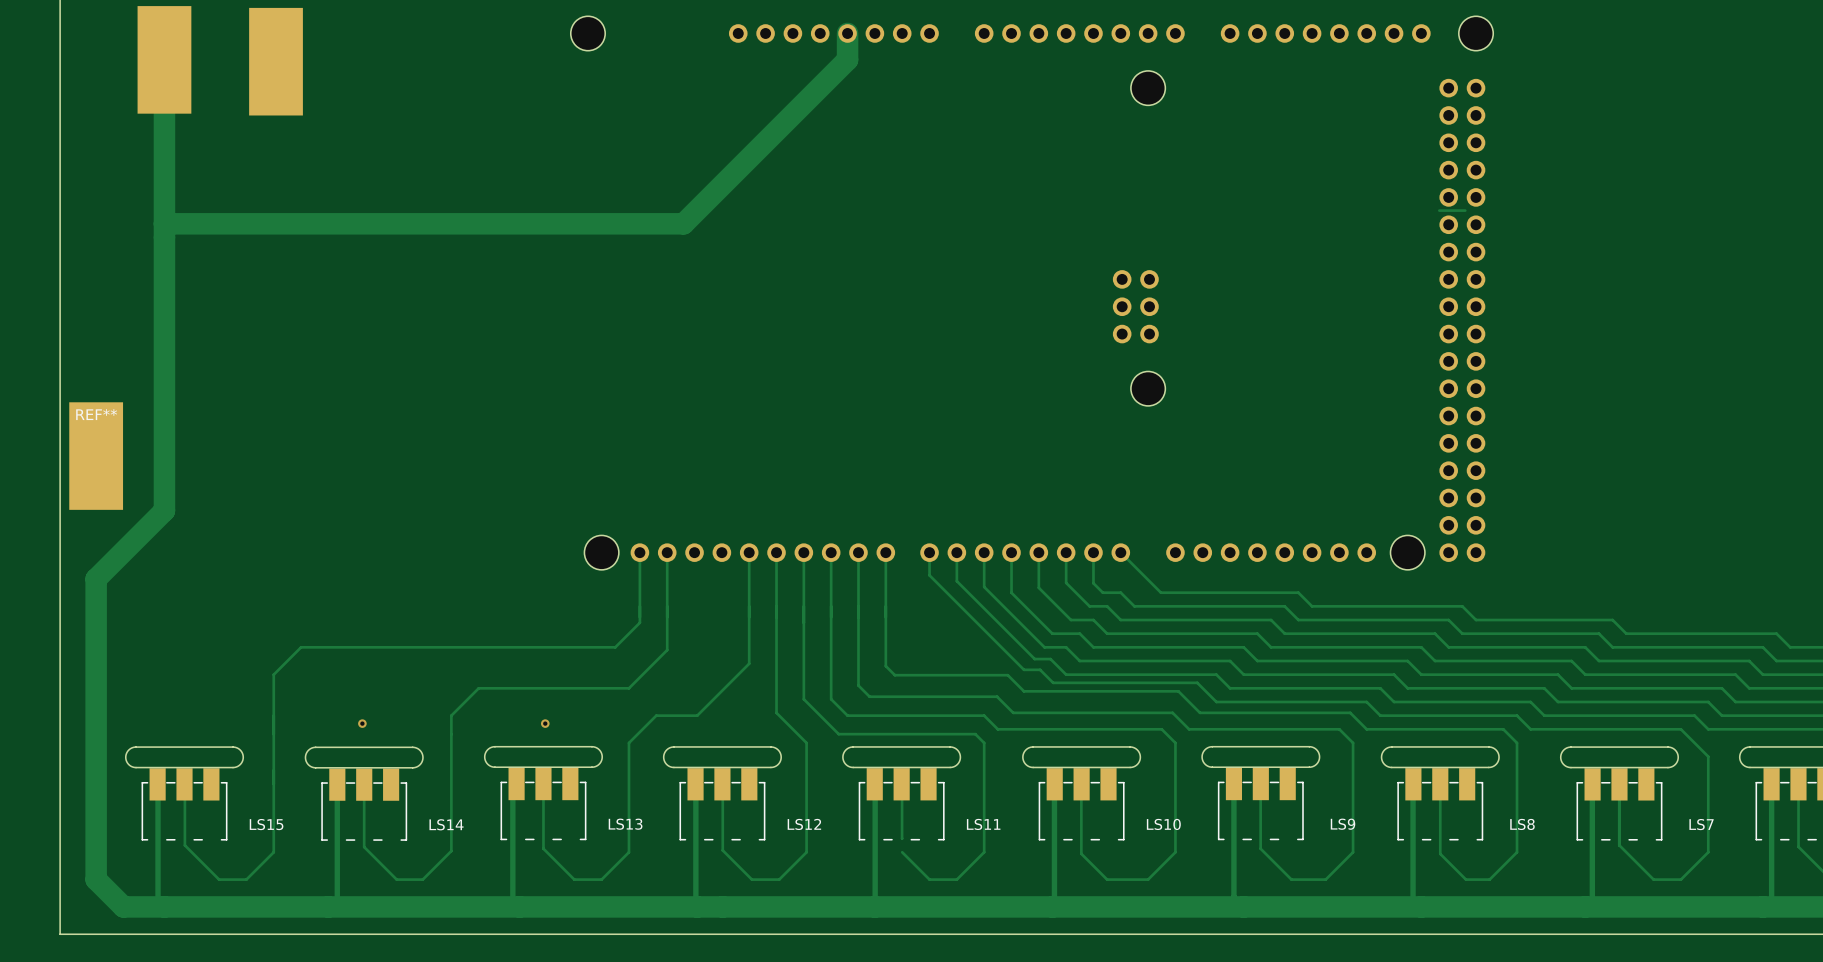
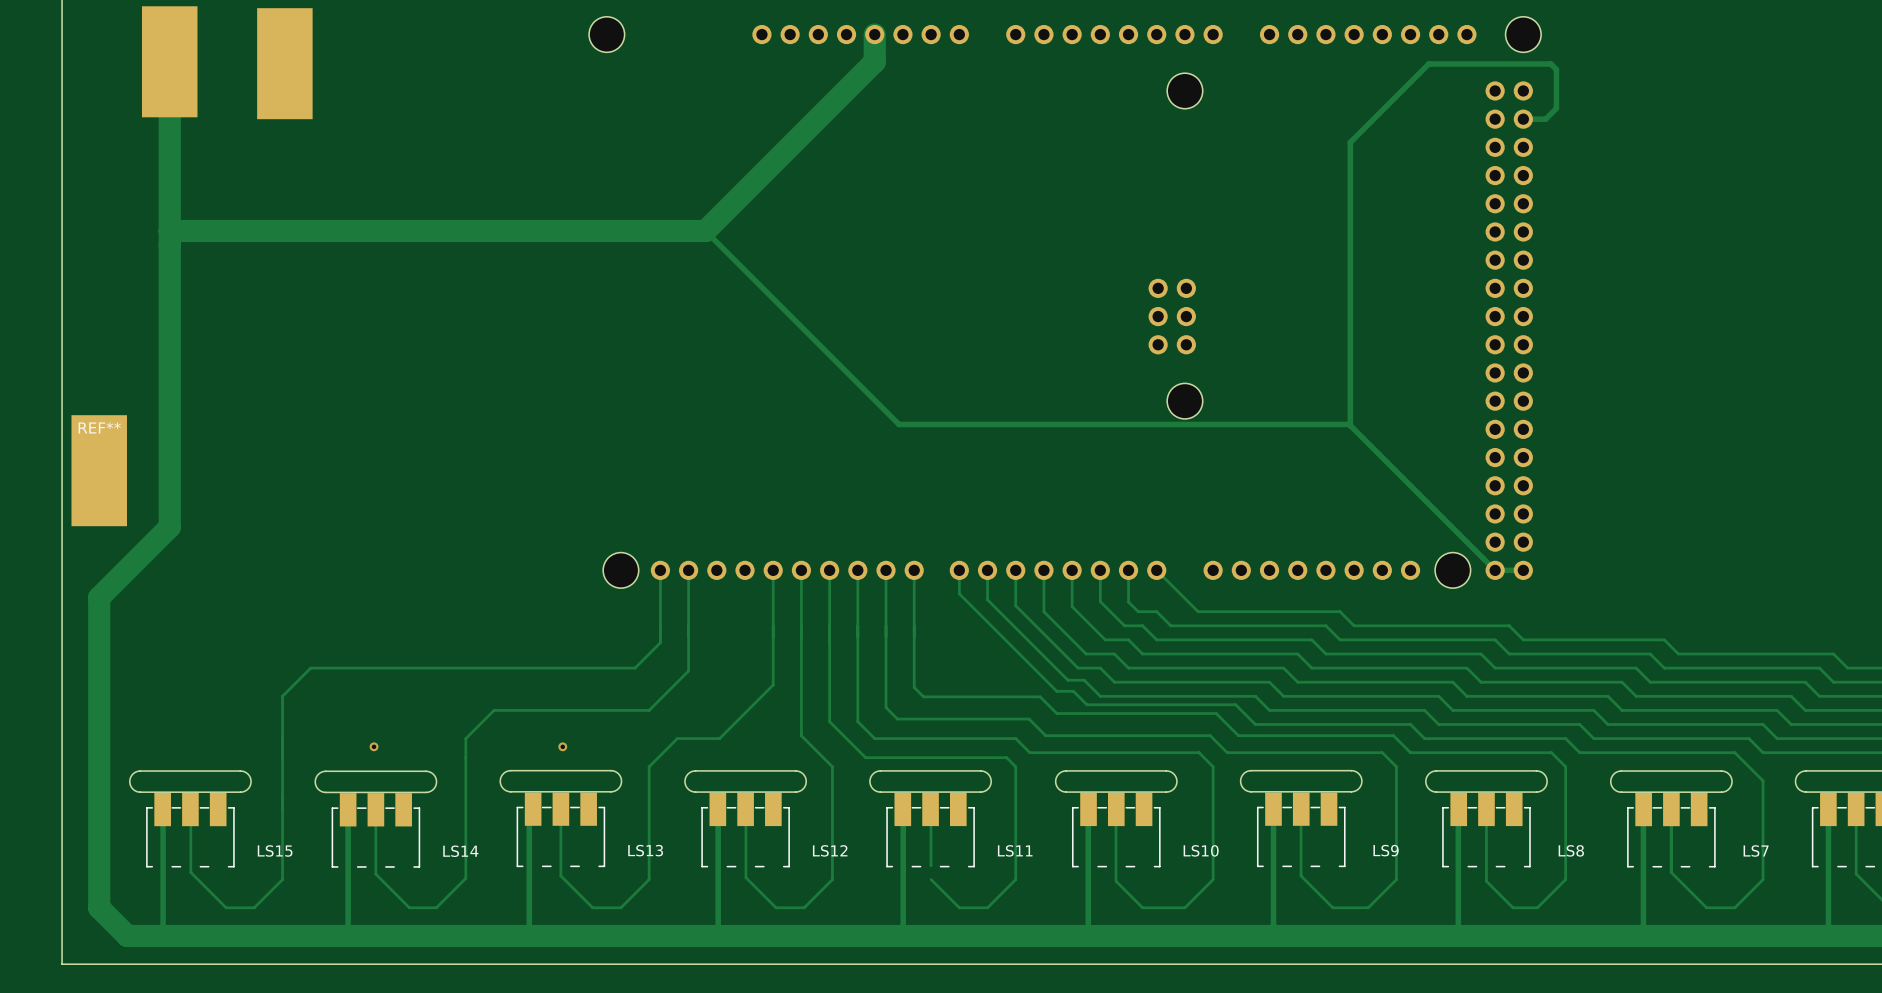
track: none -> (1523, 119) (1545, 119) (1556, 108) (1556, 69) (1550, 64) (1428, 64) (1350, 142) (1350, 425)
track: (1439, 210) (1465, 210) -> none
track: none -> (705, 230) (899, 424) (1349, 424) (1495, 570) (1523, 570)

